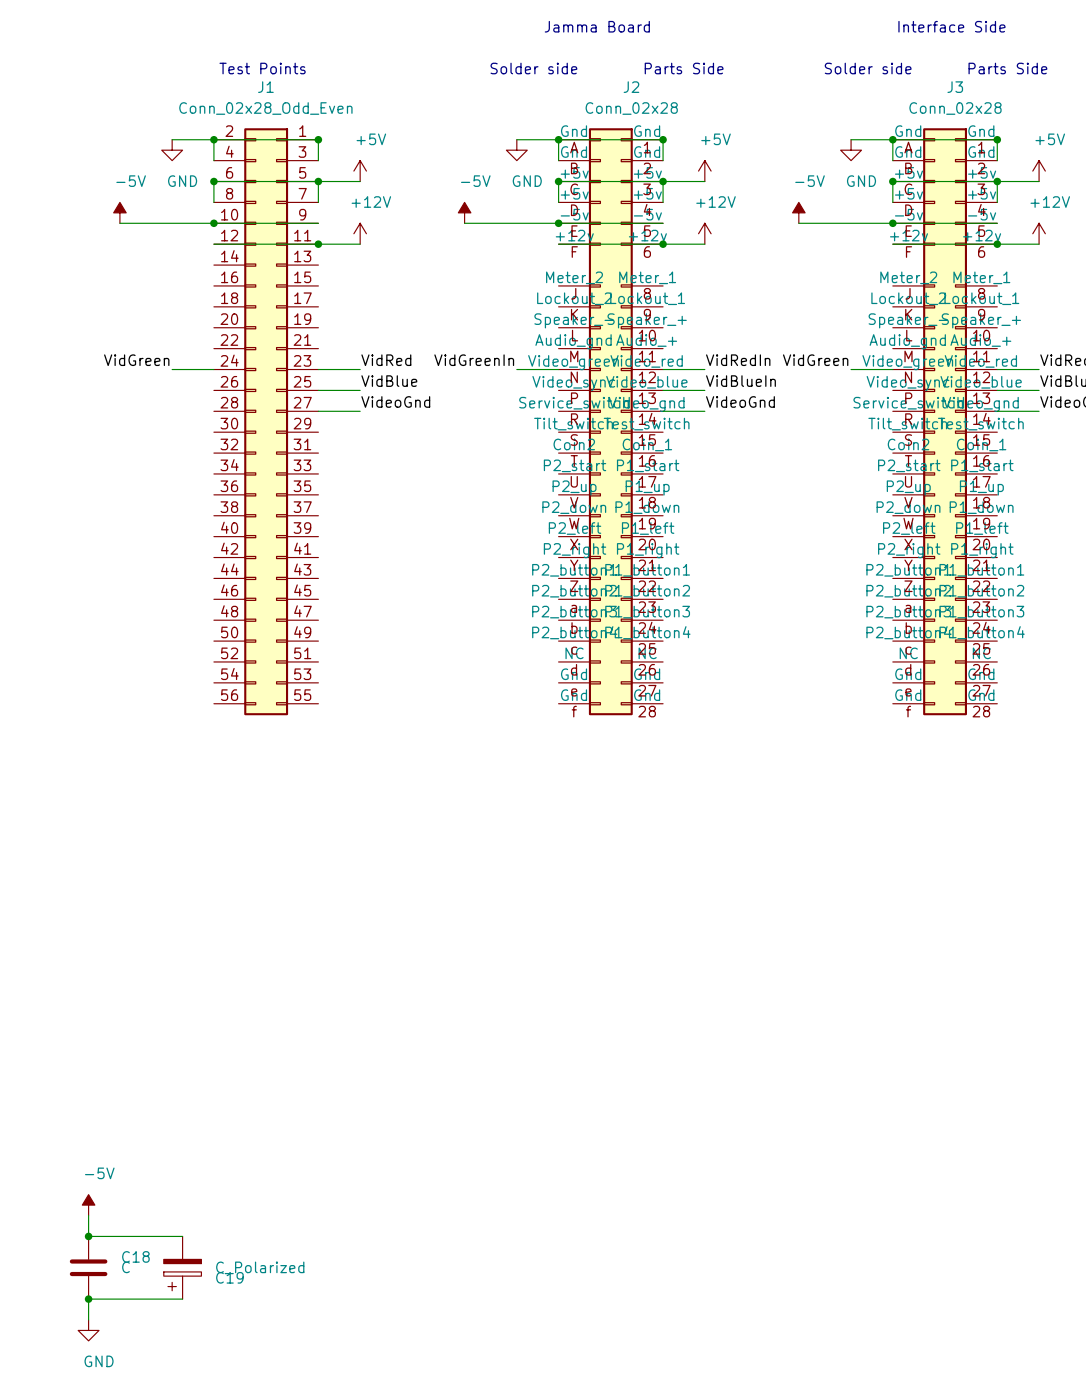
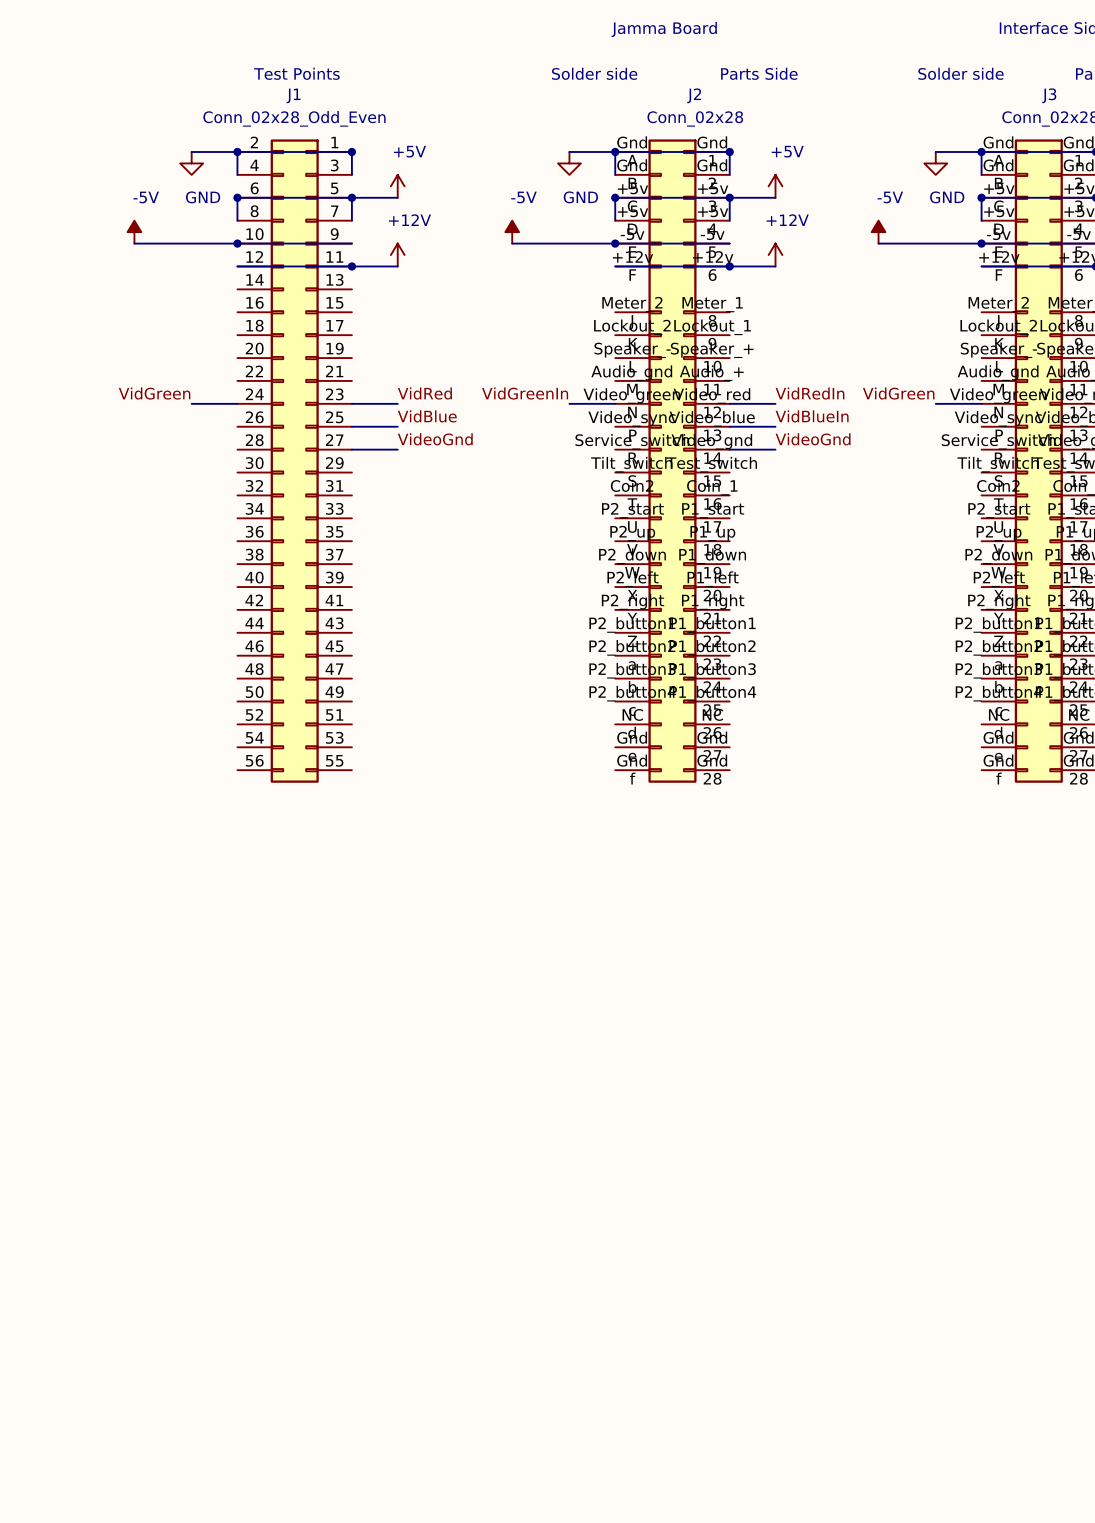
power symbol: -5V (88, 1205) -> none
wire: (88, 1215) (88, 1236) (182, 1236) -> none
junction: (88, 1236) -> none
C18: C (88, 1267) -> none
C19: C_Polarized (182, 1267) -> none
junction: (88, 1299) -> none
wire: (182, 1299) (88, 1299) (88, 1319) -> none
power symbol: GND (88, 1330) -> none

